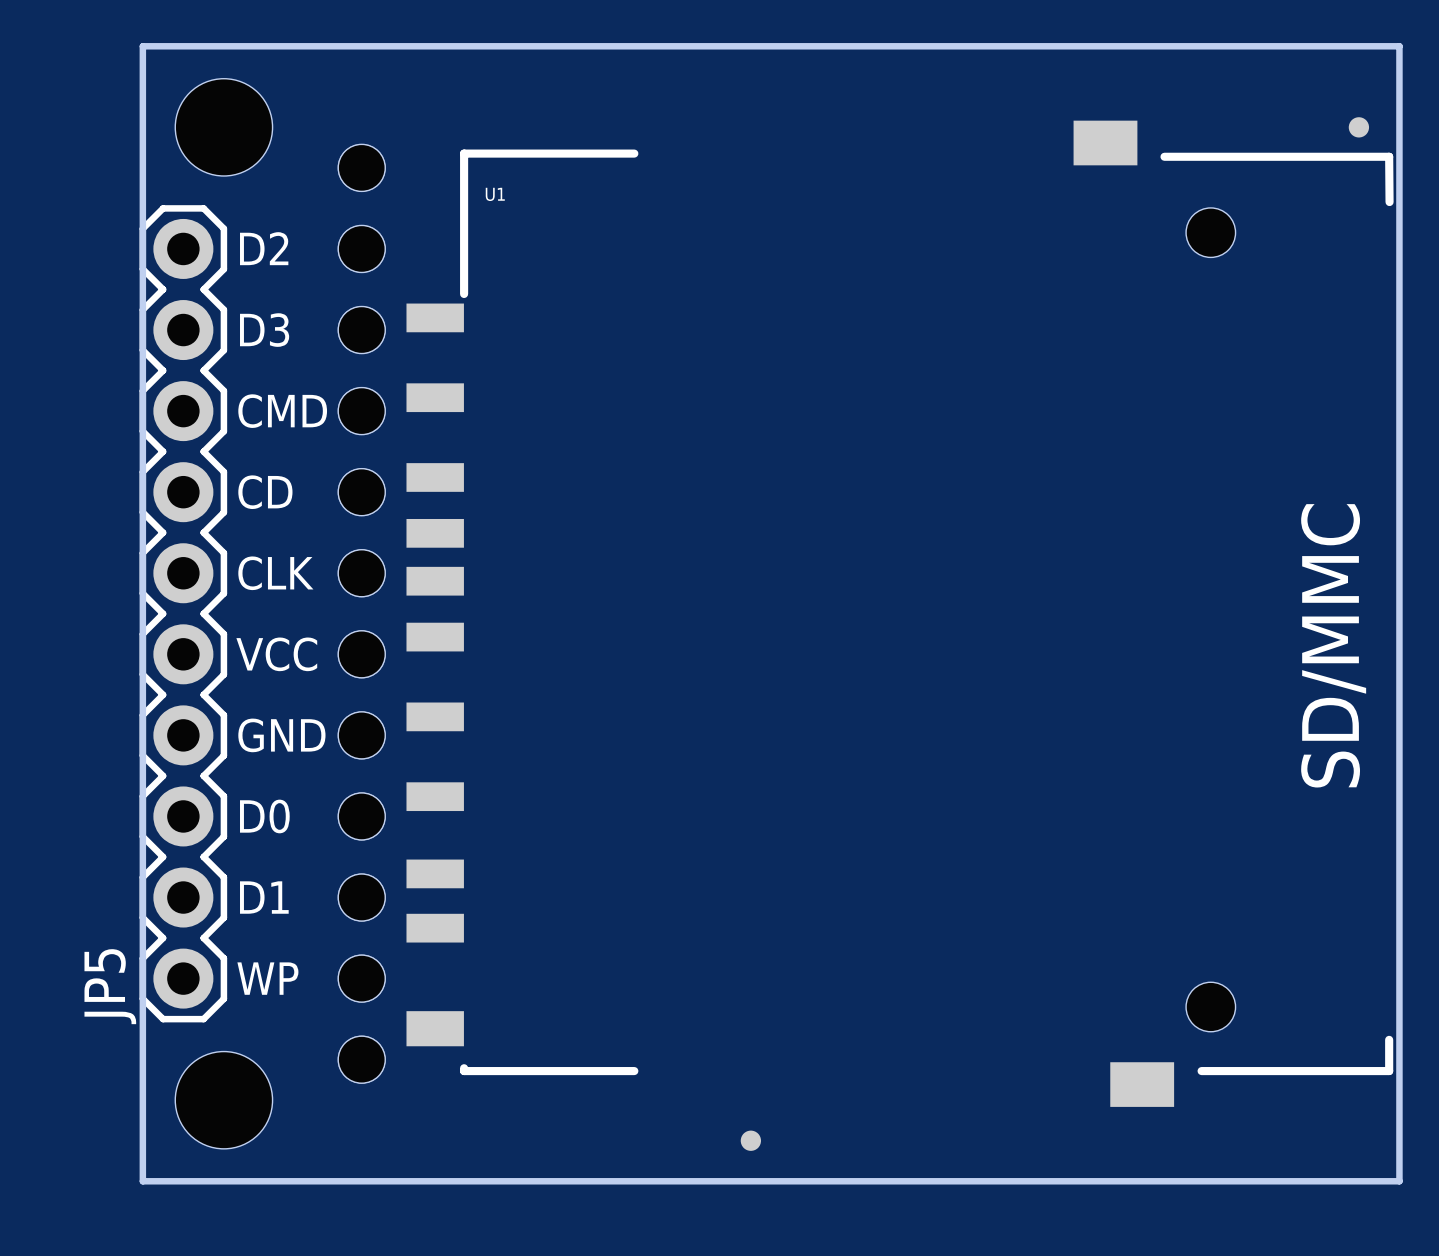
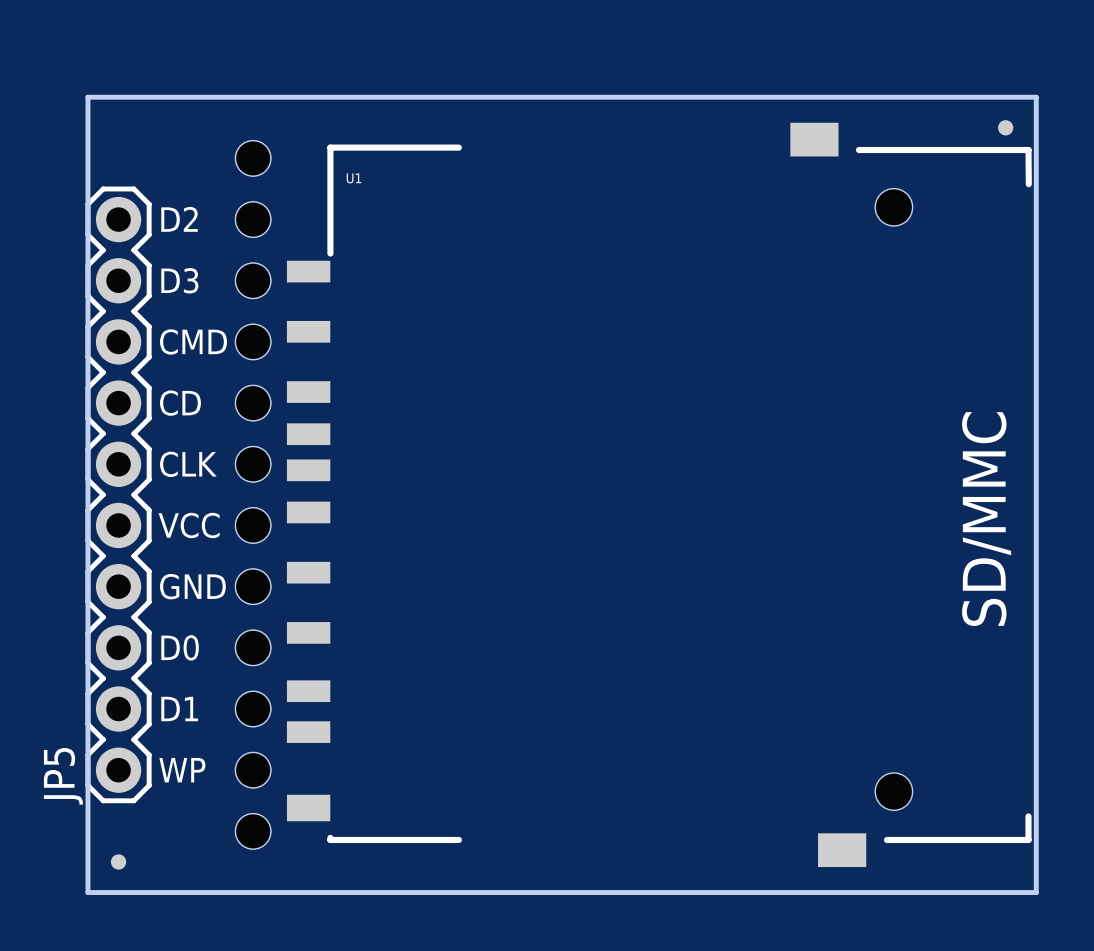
board edge: (142, 86) (142, 46) (1399, 46) (1399, 86) -> (87, 97) (1036, 97)
part: (223, 127) -> none
part: (223, 1100) -> none
board edge: (142, 1140) (142, 1181) (1399, 1181) (1399, 1140) -> (87, 892) (1036, 892)
part position: (750, 1140) -> (118, 861)

